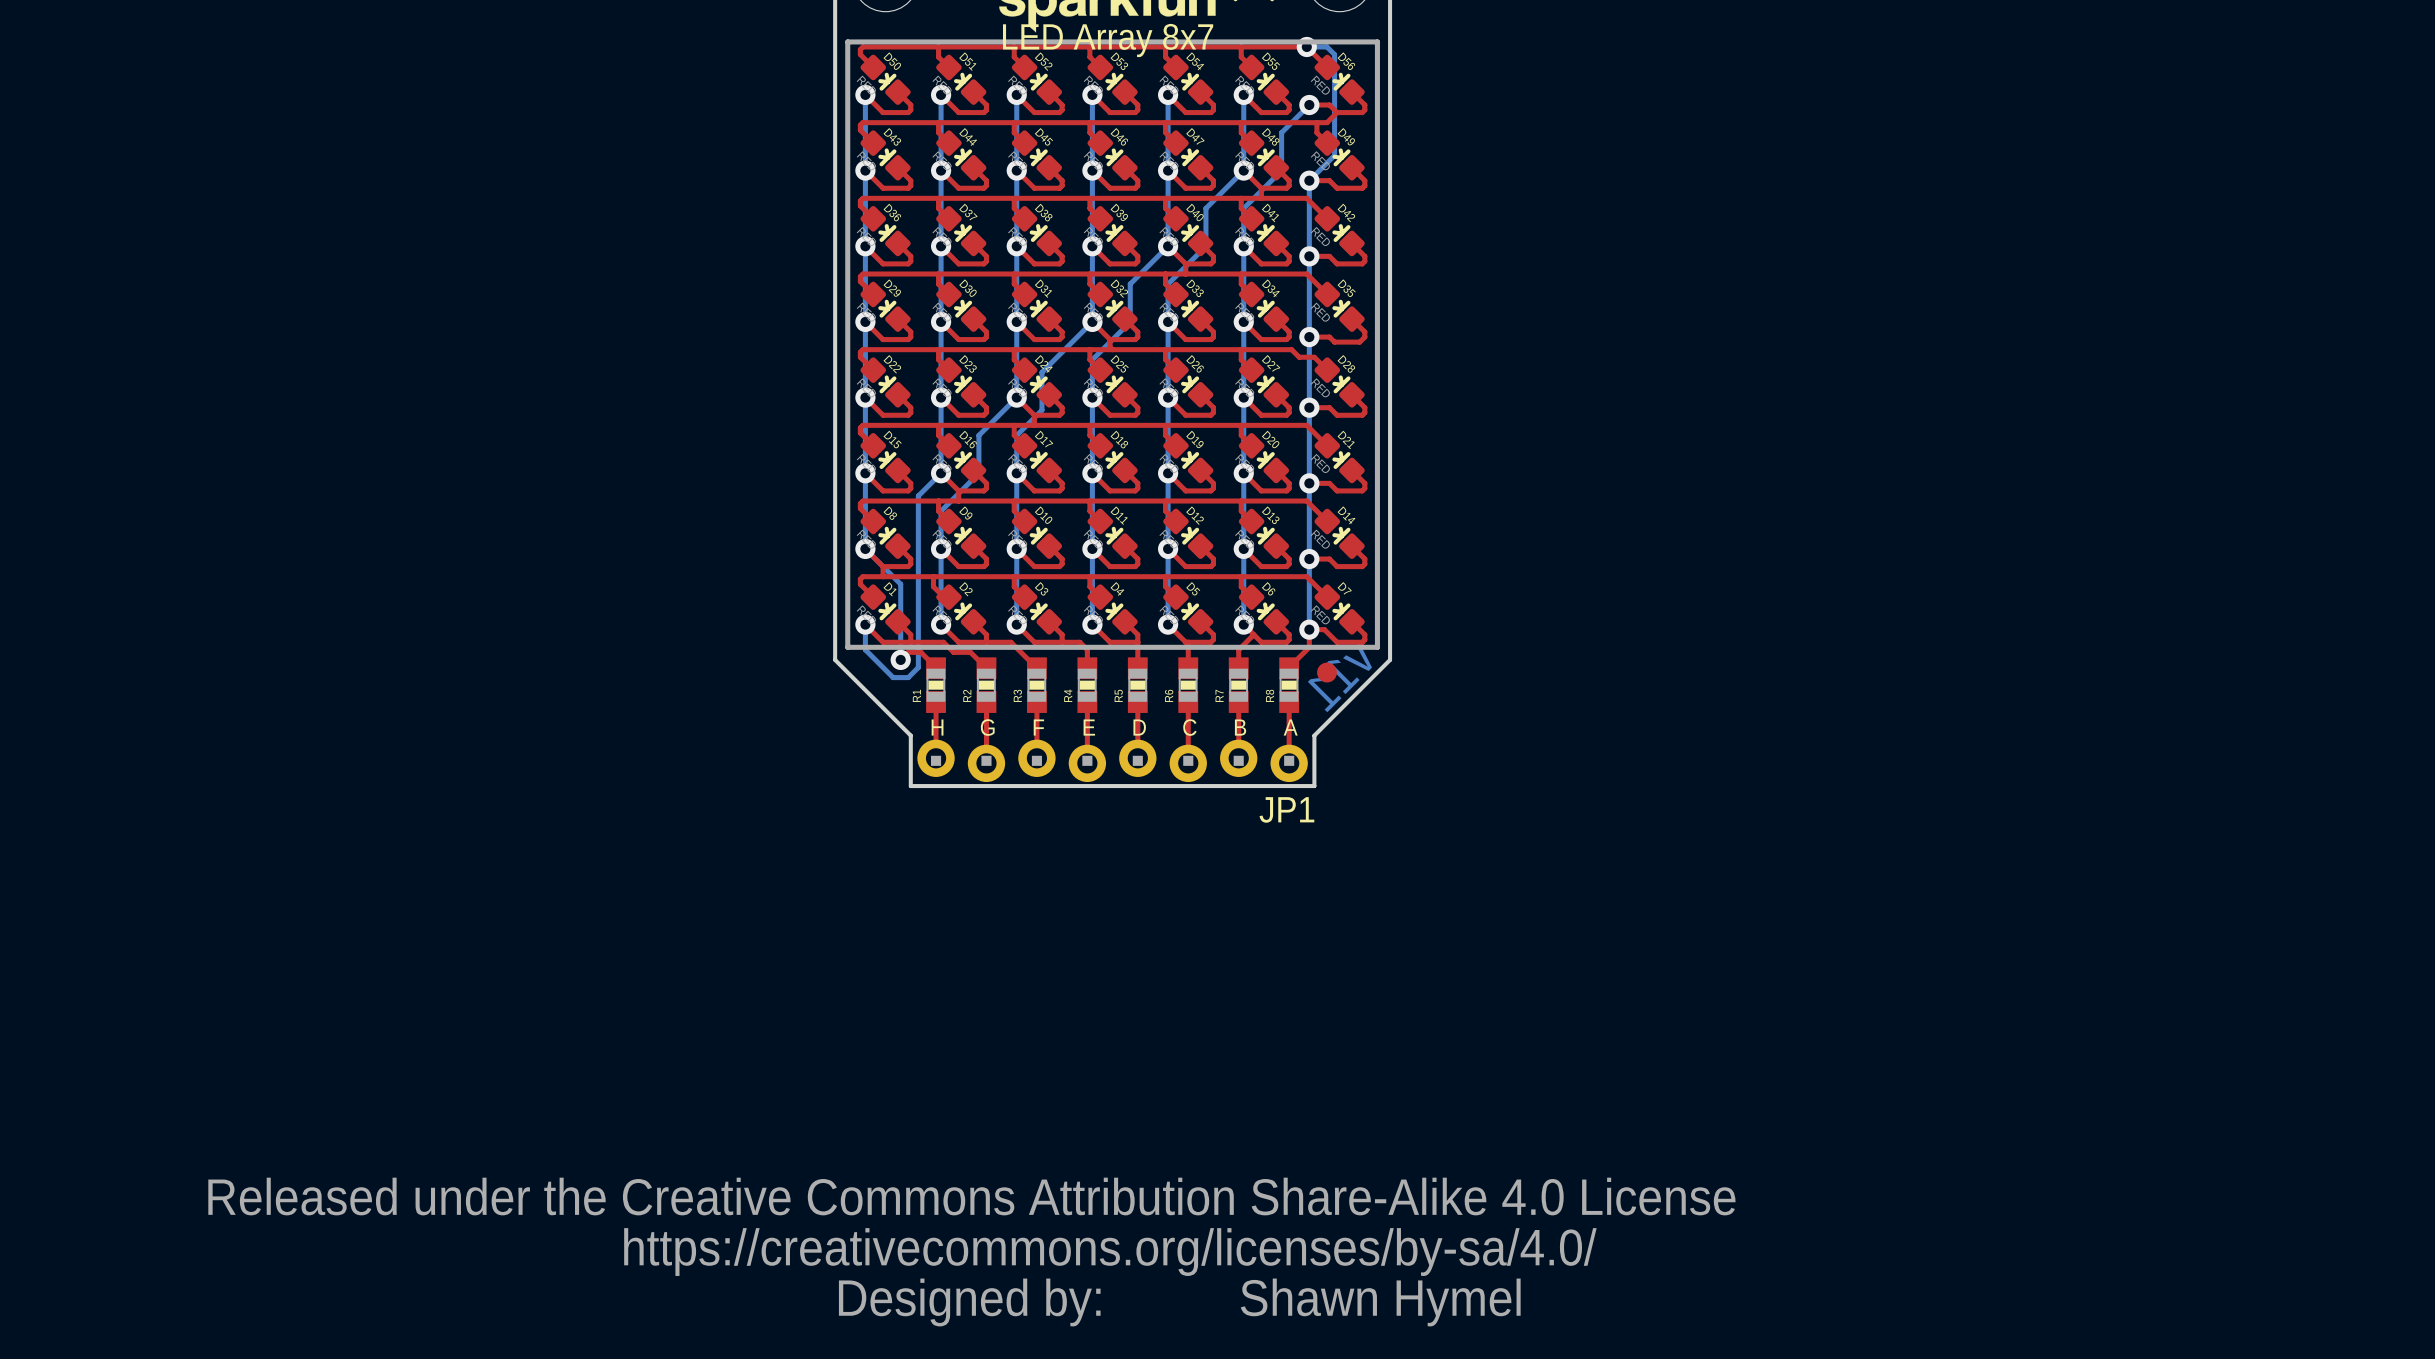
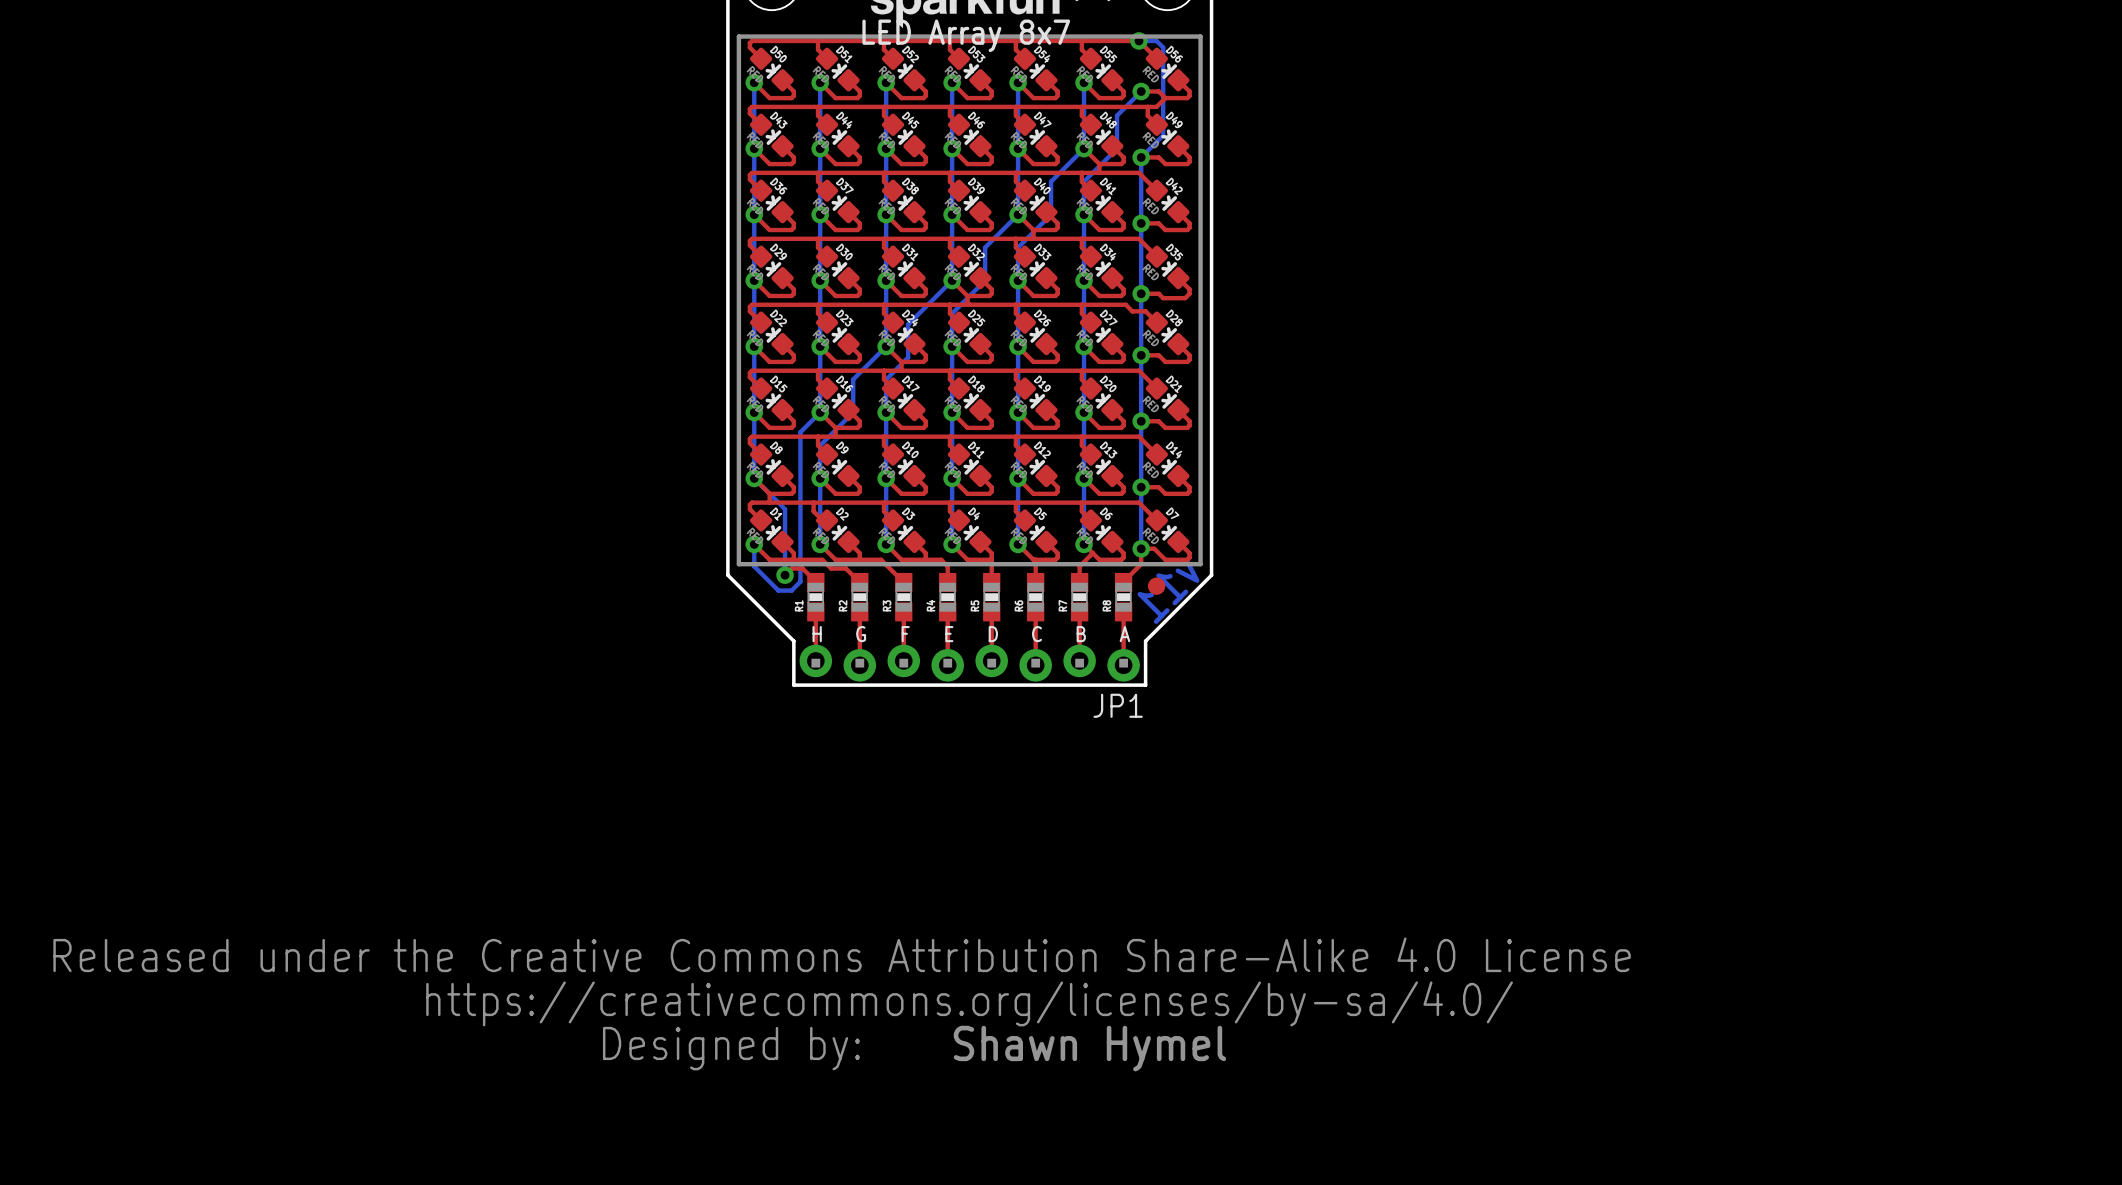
drawing: [208, 642, 1736, 1327] -> none
drawing: none -> [53, 937, 1631, 1071]
text: none -> Shawn Hymel (1089, 1048)

